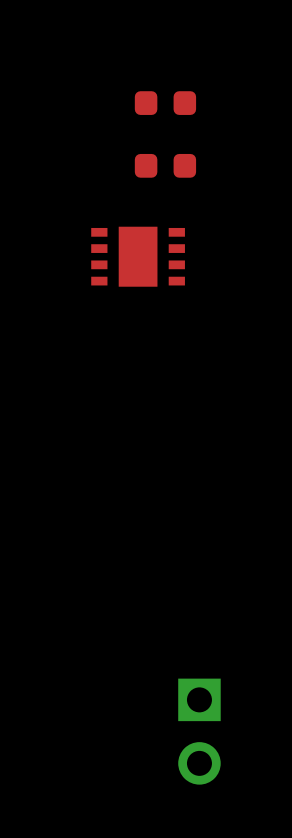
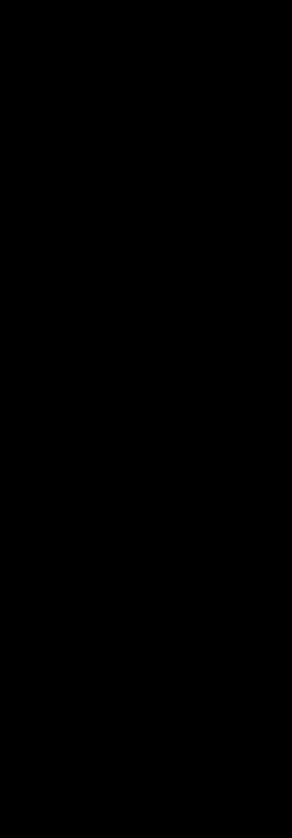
part: (165, 103) -> none
part: (165, 165) -> none
part: (138, 256) -> none
part: (199, 731) -> none

